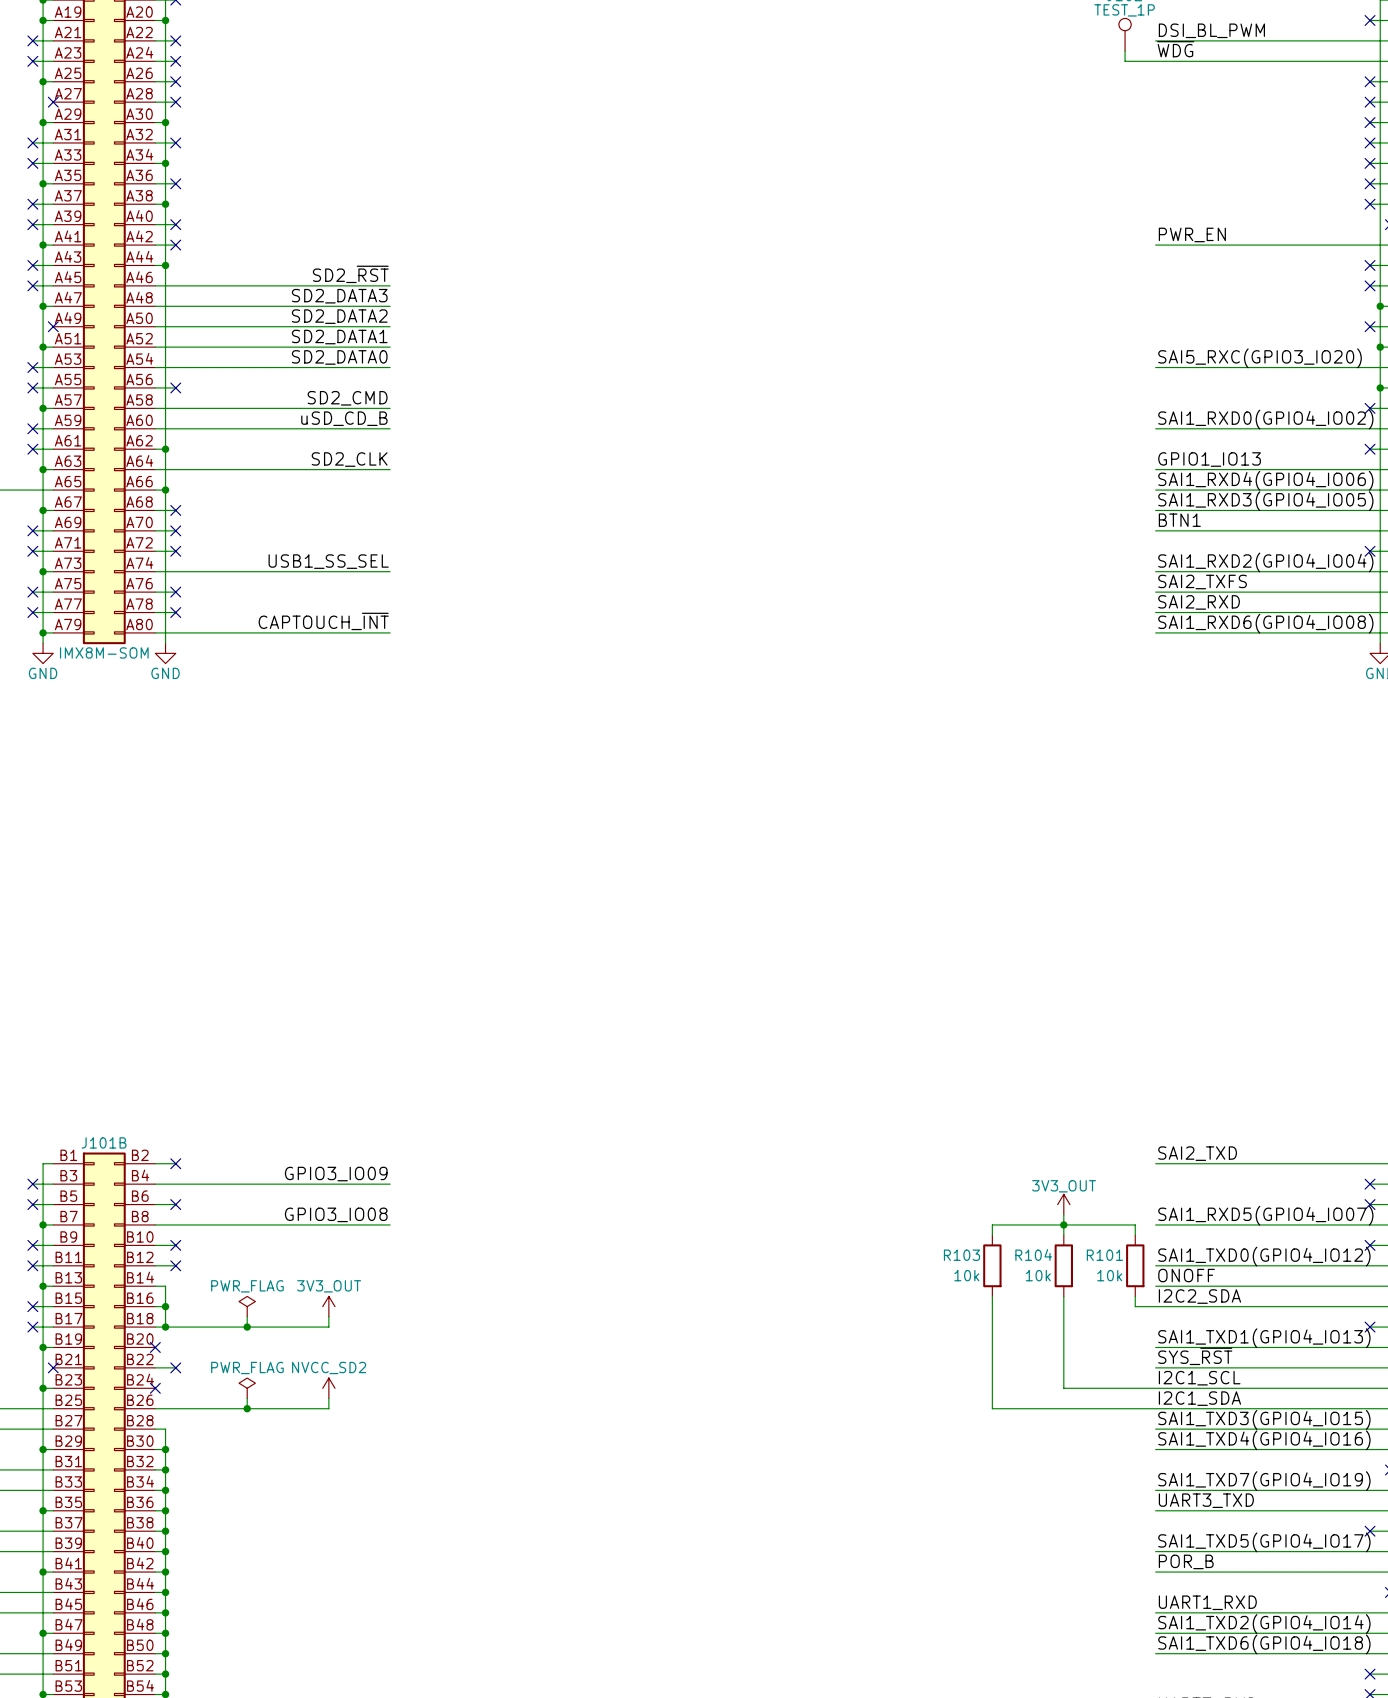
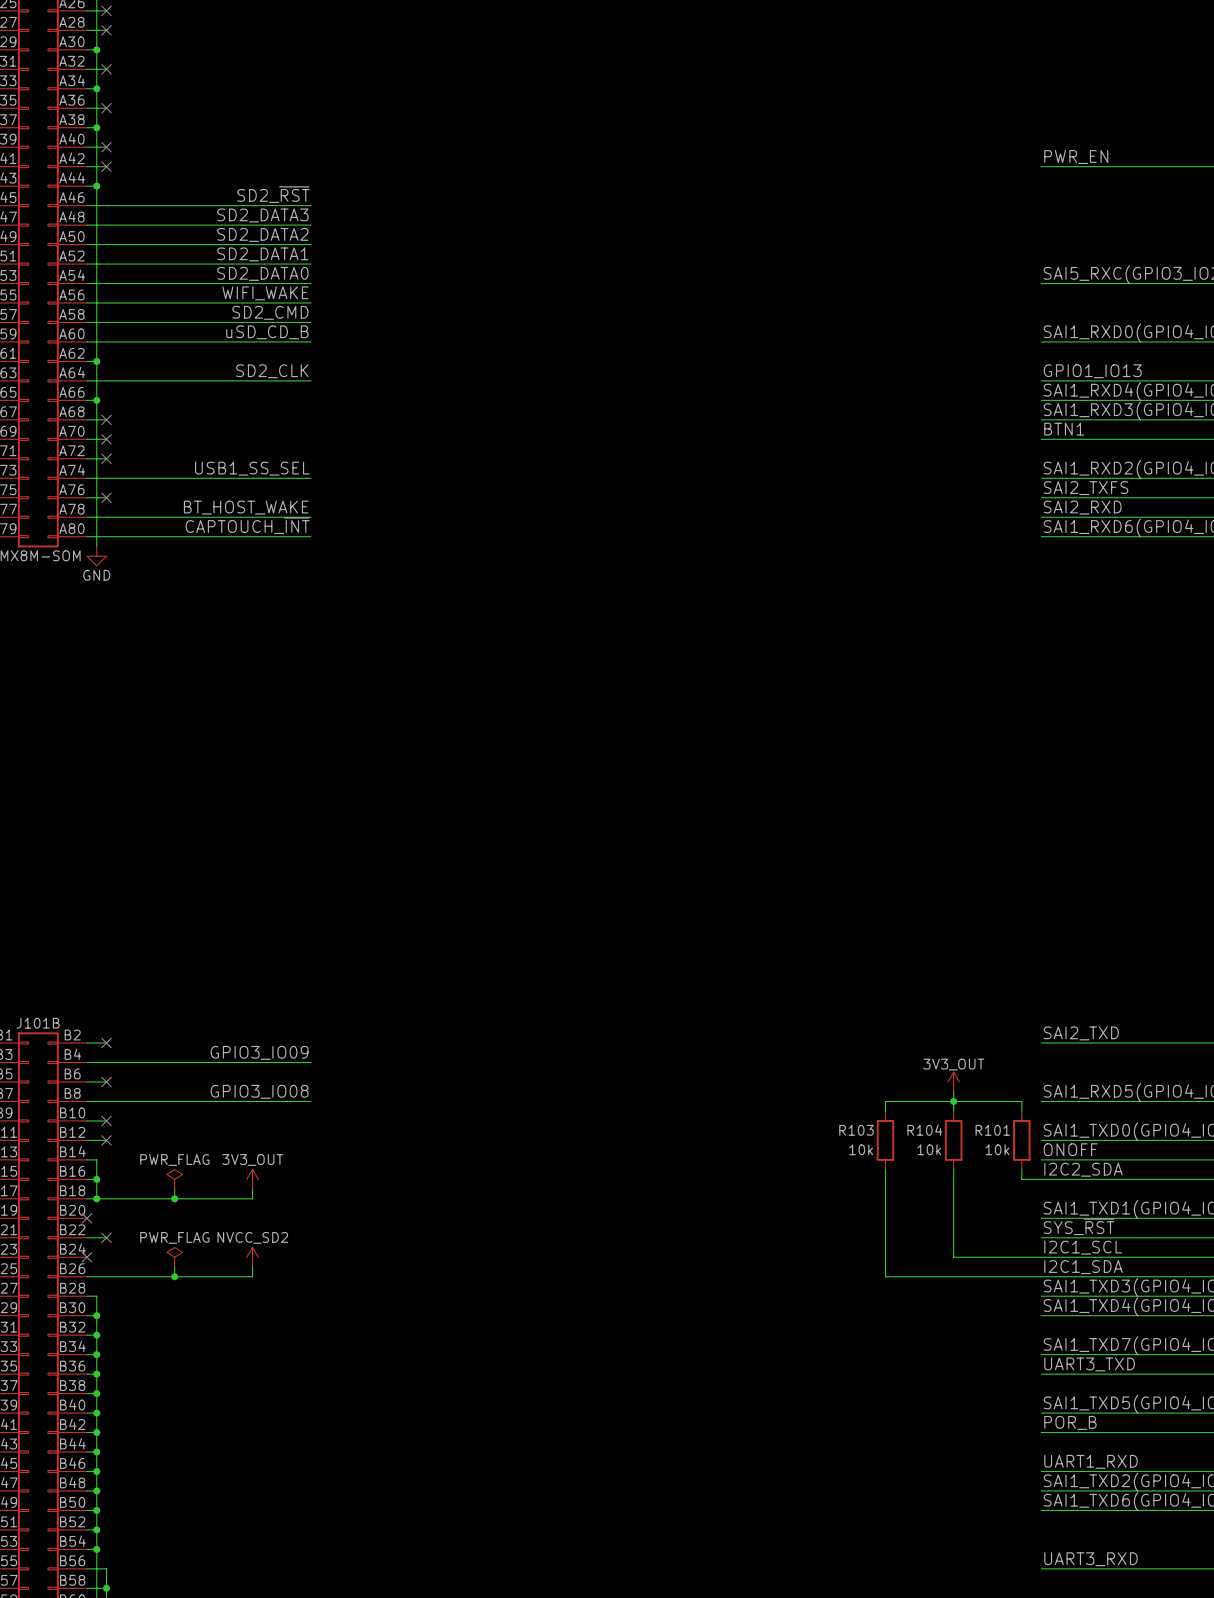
label: none -> WIFI_WAKE (265, 293)
wire: none -> (106, 303) (310, 303)
no-connect mark: (175, 387) -> none
label: none -> BT_HOST_WAKE (246, 507)
wire: none -> (106, 517) (310, 517)
no-connect mark: (175, 612) -> none

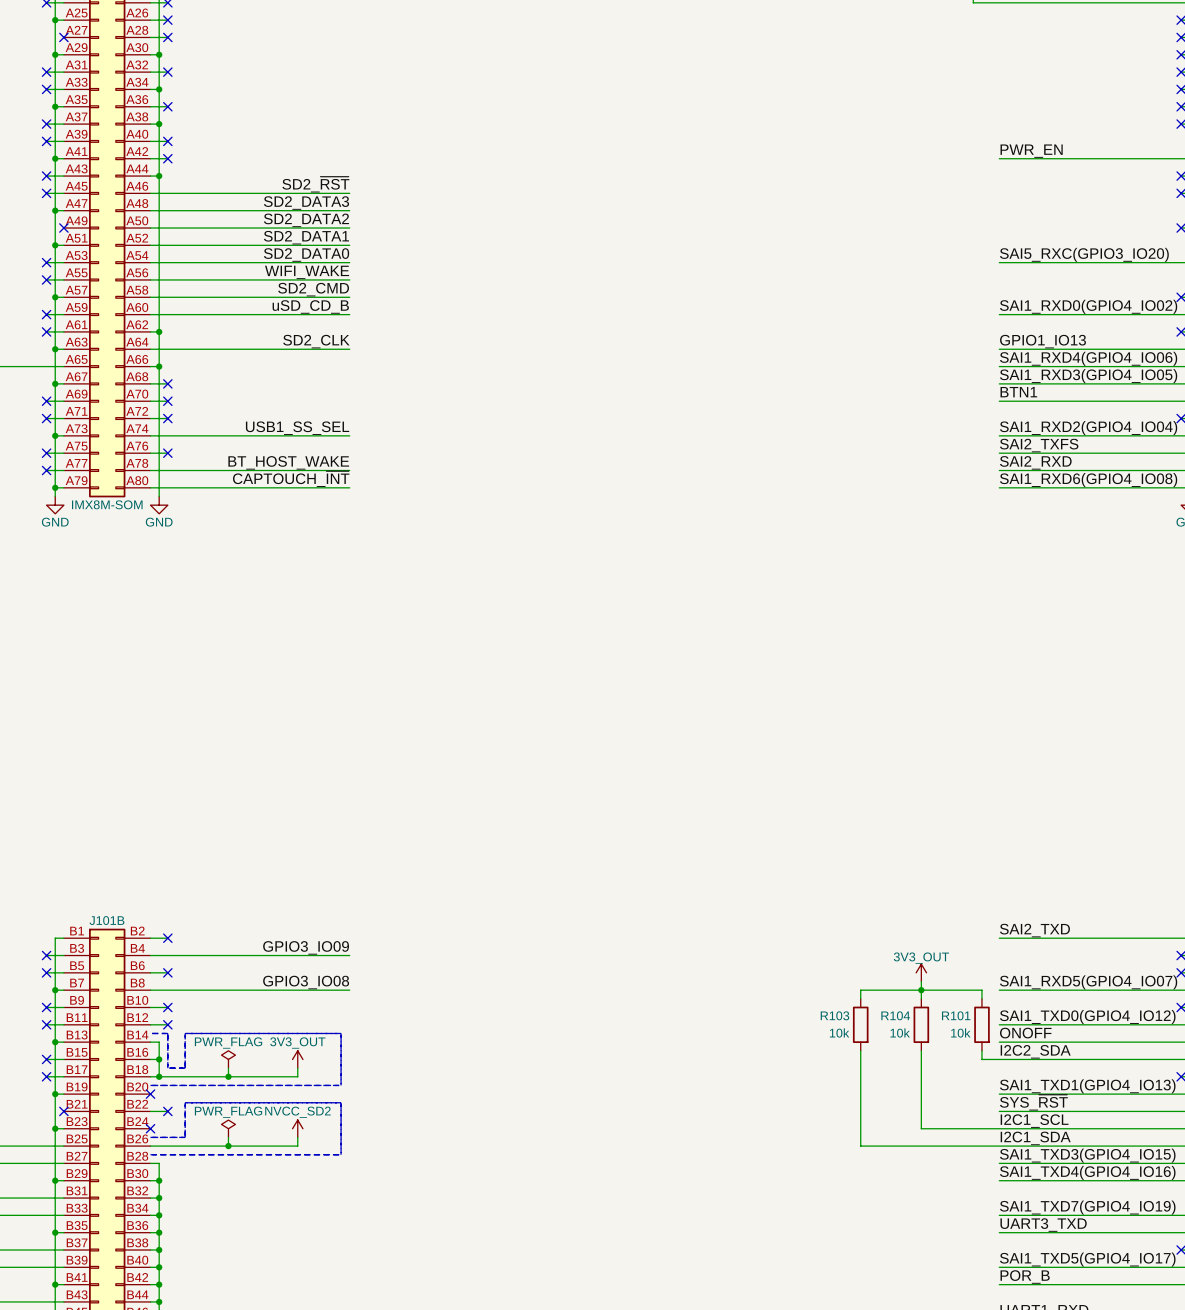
line: none -> (150, 1033) (167, 1033) (167, 1068) (185, 1068) (185, 1033) (341, 1033) (341, 1085) (150, 1085)
line: none -> (150, 1137) (185, 1137) (185, 1102) (341, 1102) (341, 1154) (150, 1154)

